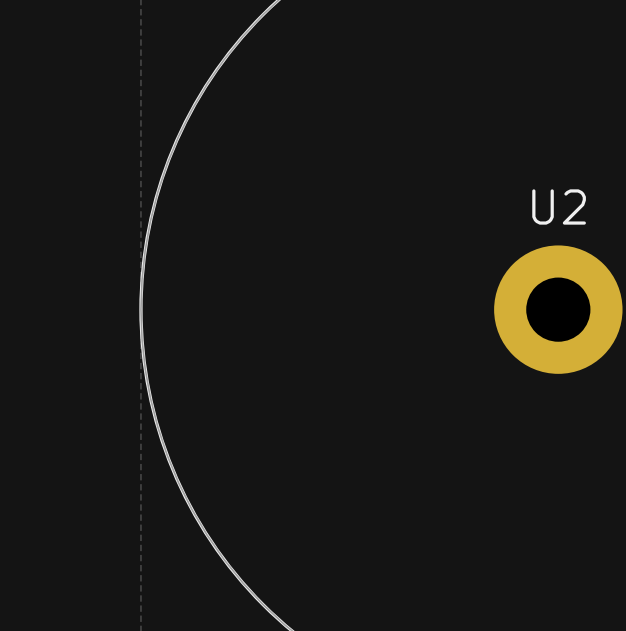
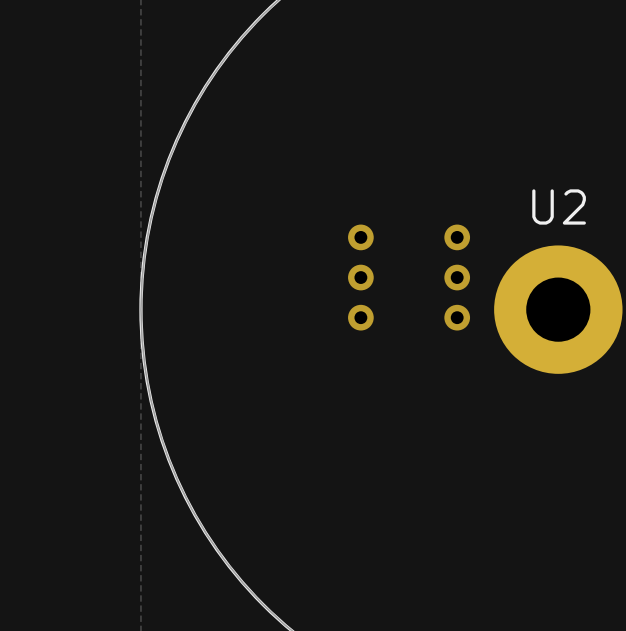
via: none -> (360, 237)
via: none -> (457, 237)
via: none -> (360, 277)
via: none -> (457, 277)
via: none -> (360, 317)
via: none -> (457, 317)

